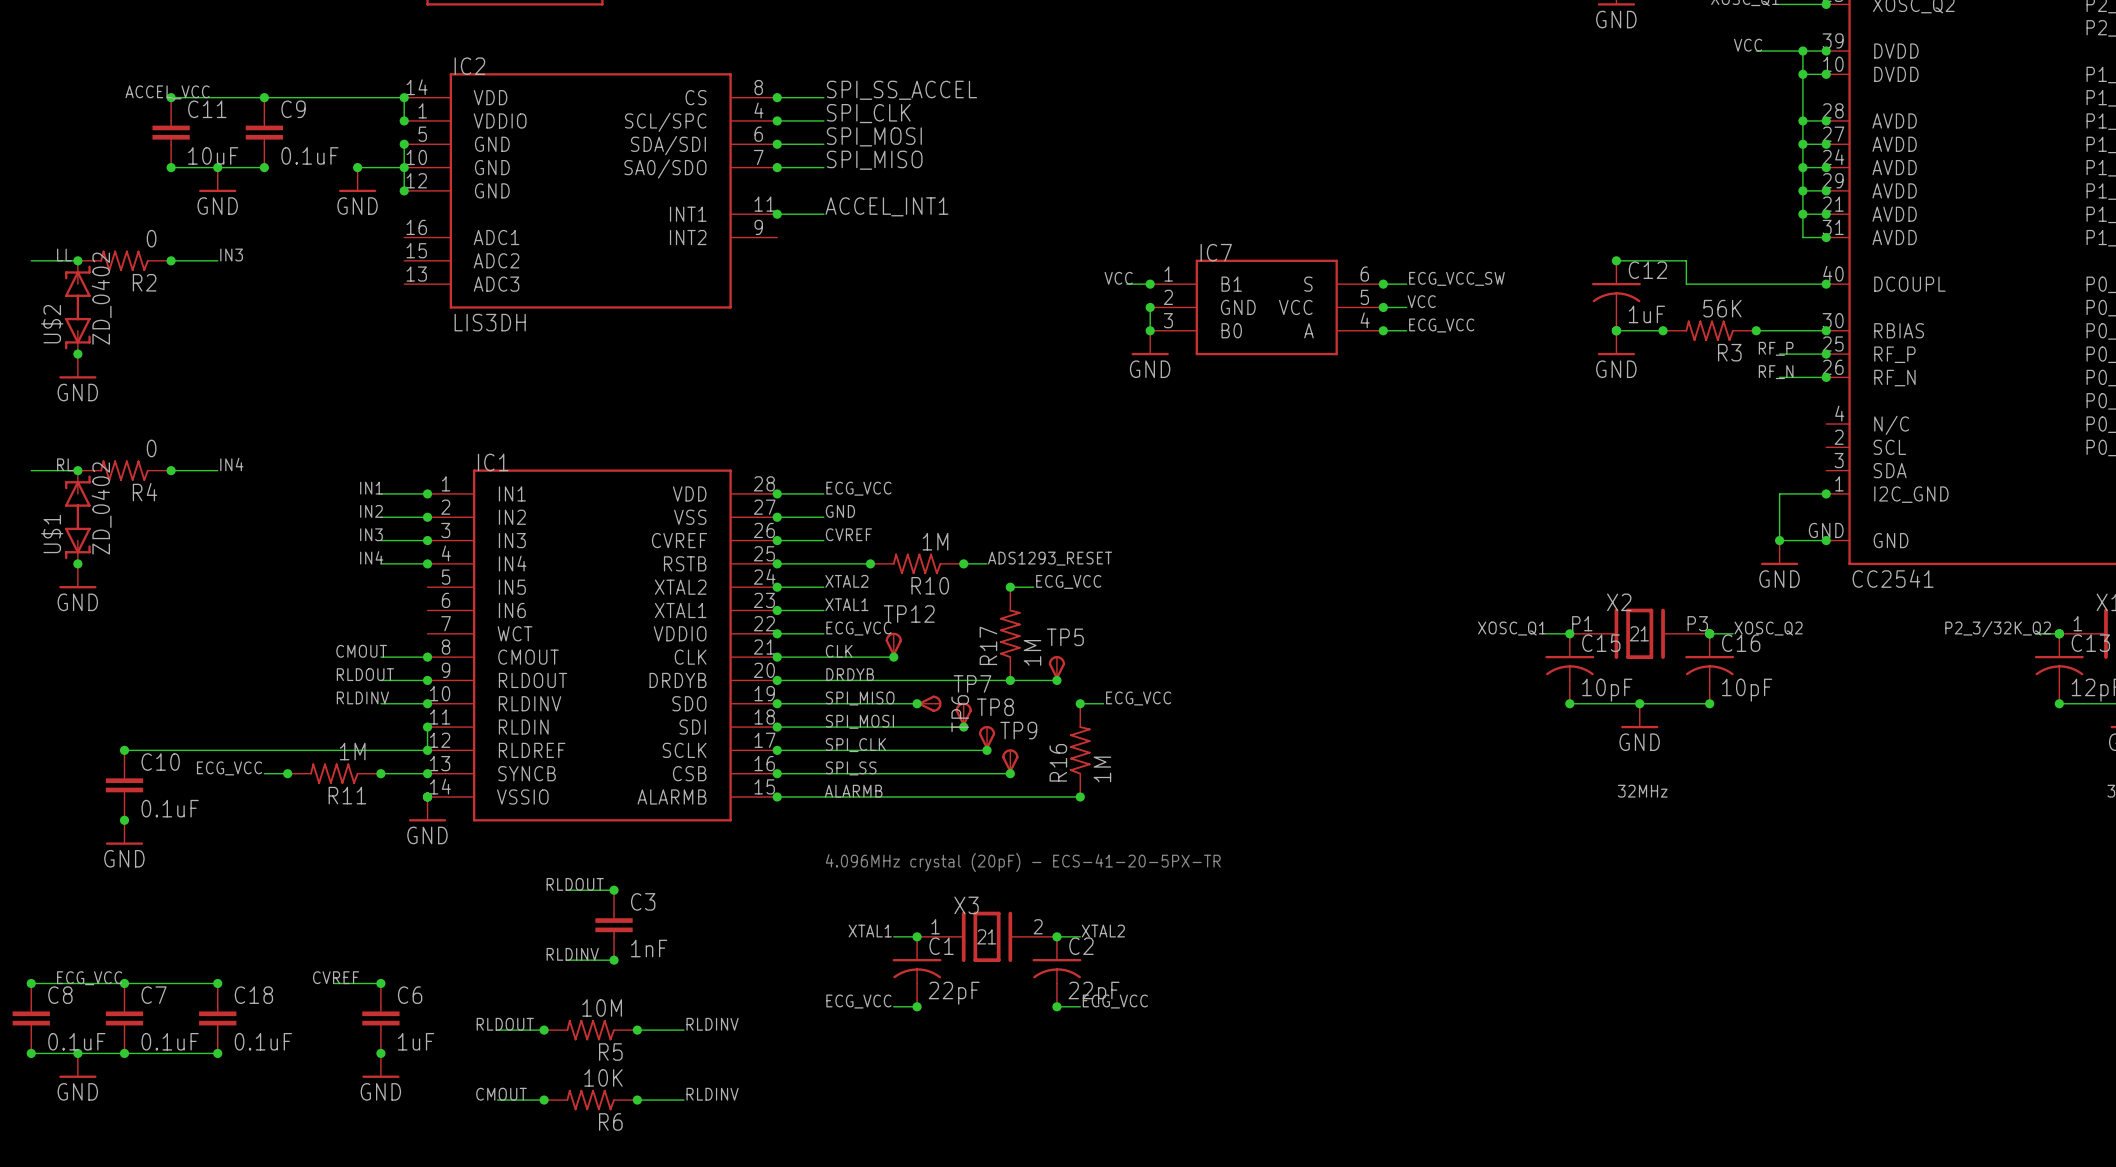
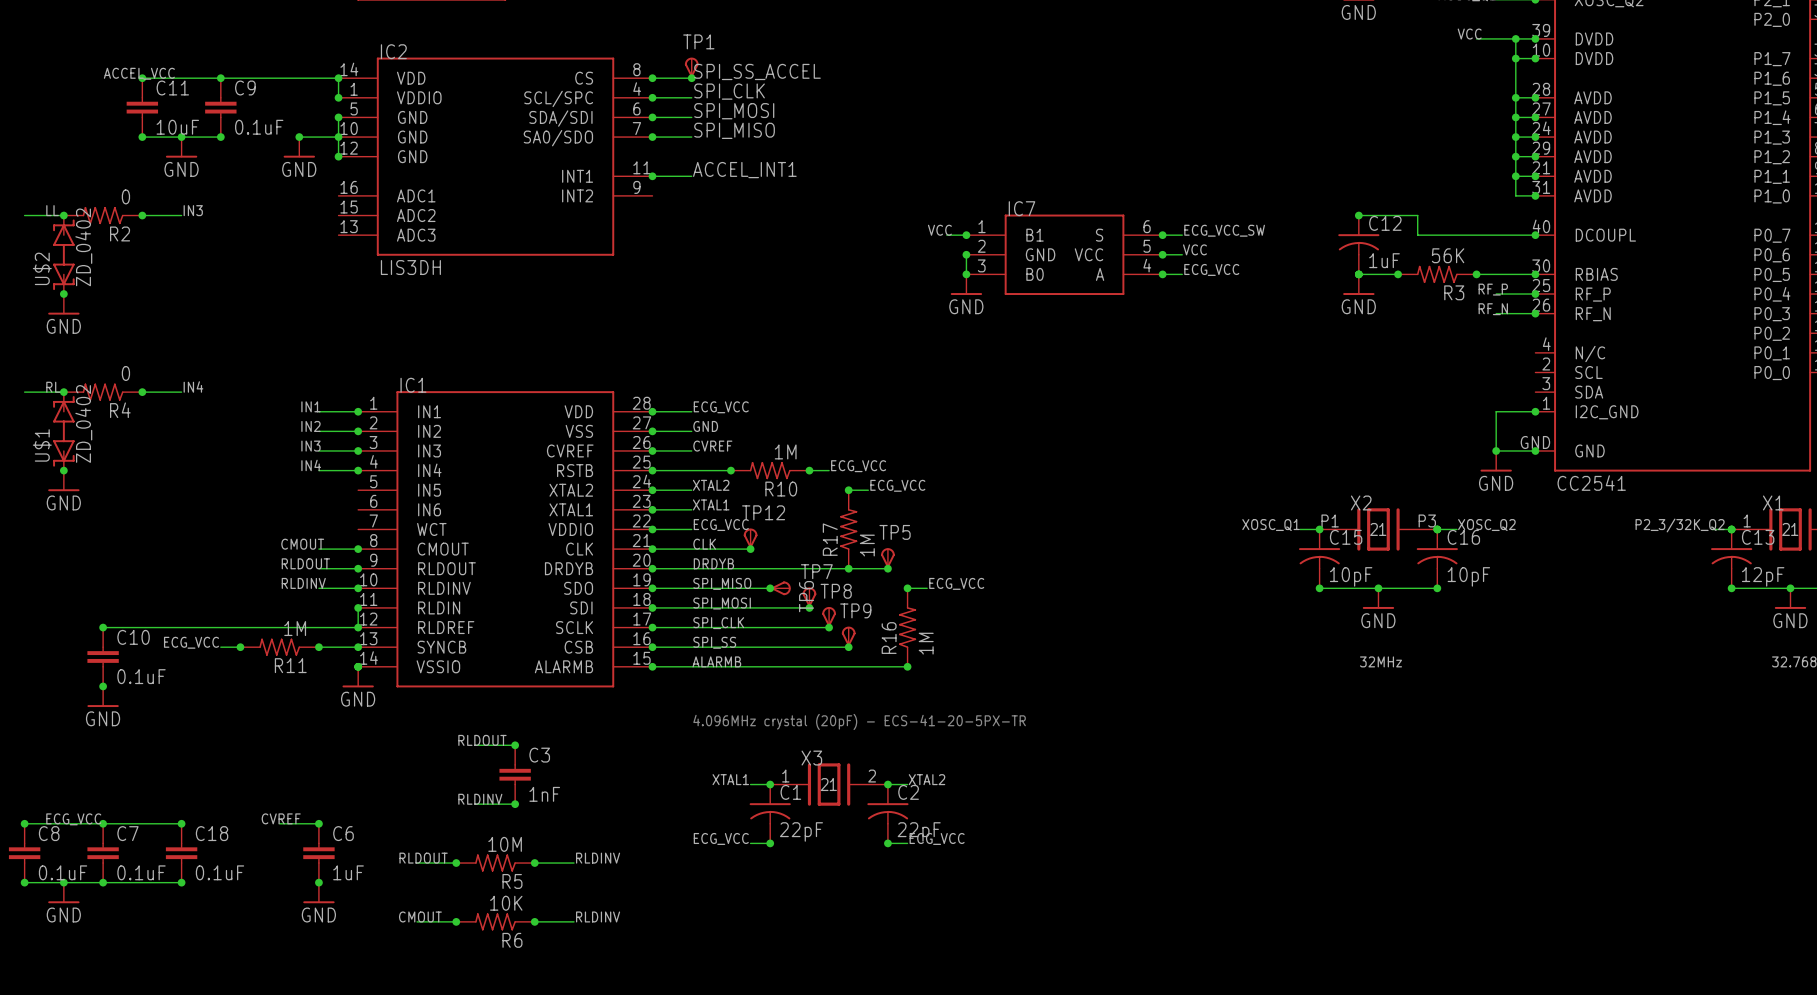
TP1: none -> (691, 67)
junction: none -> (691, 78)
label: ADS1293_RESET (1050, 558) -> ECG_VCC (858, 466)

